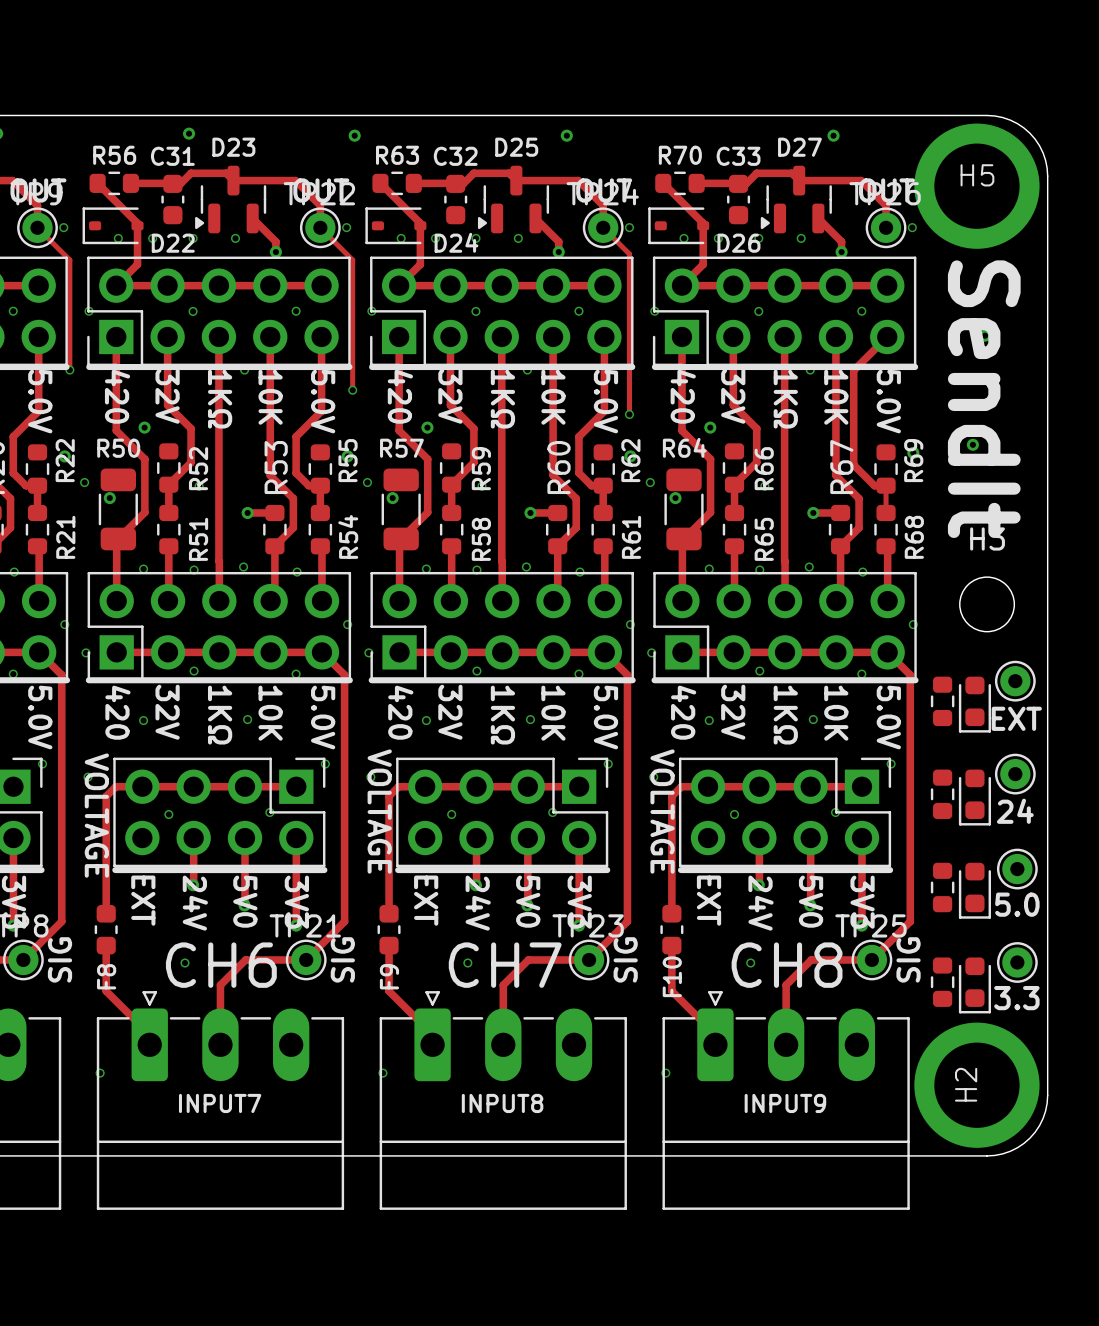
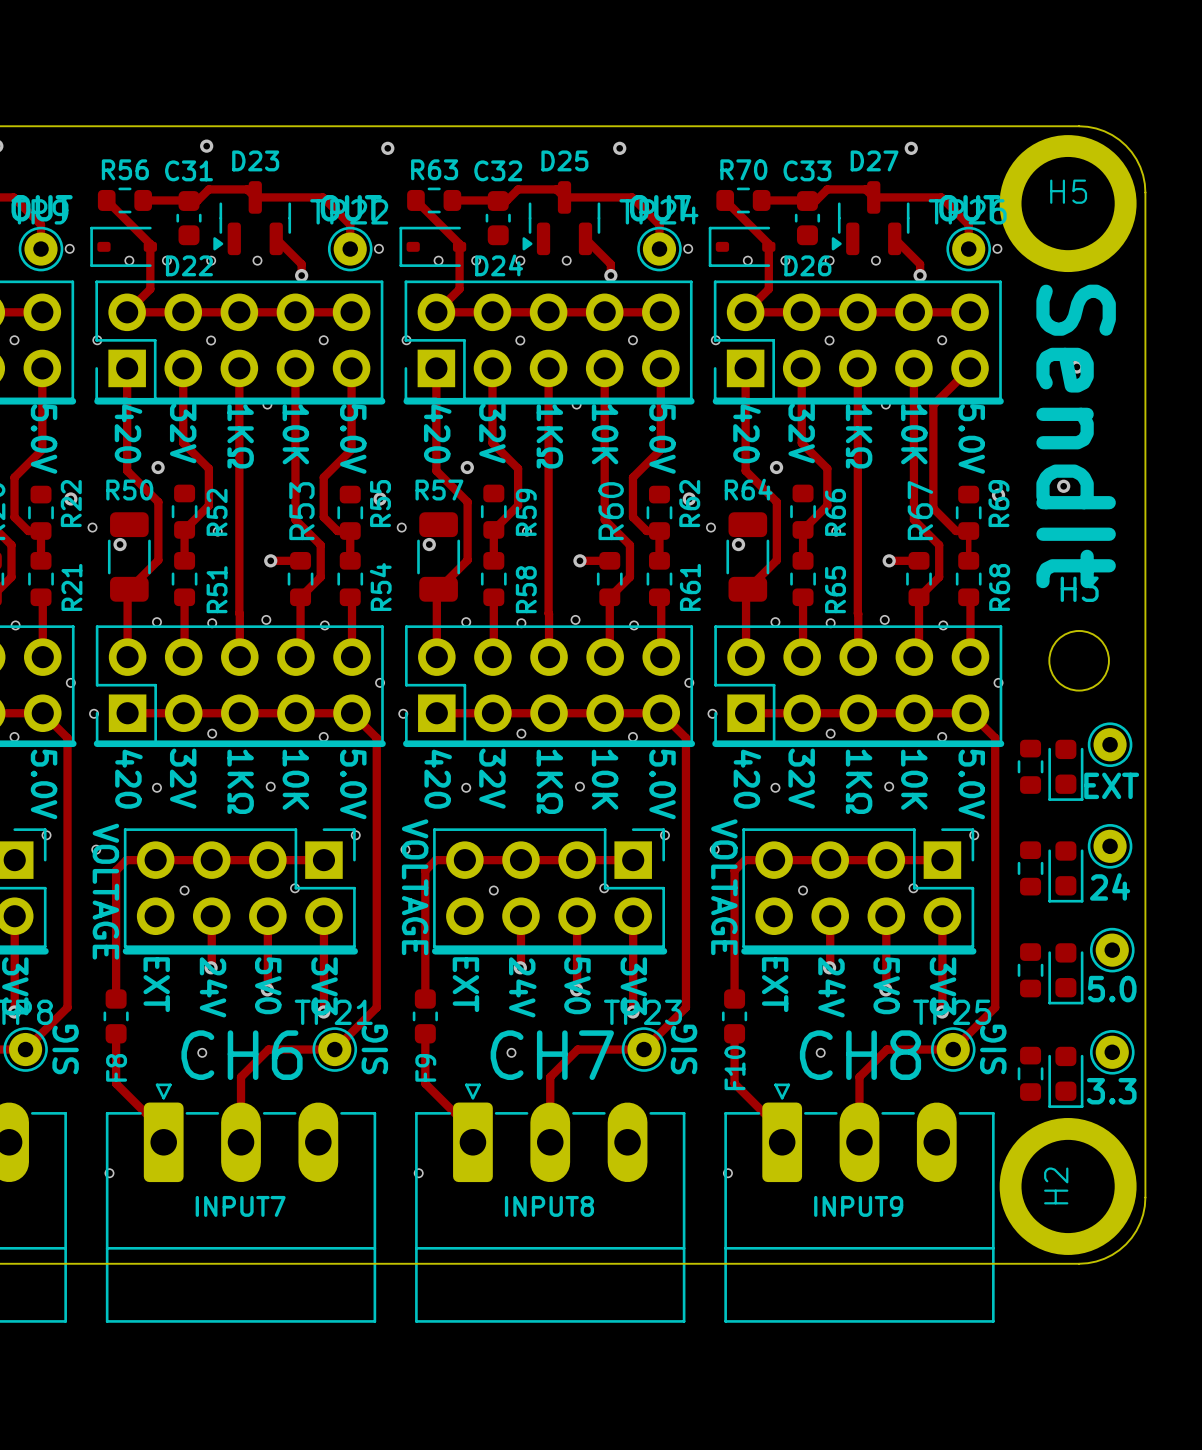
track: (37, 227) (69, 260) (69, 370) -> none
track: (320, 227) (352, 260) (352, 390) -> none
track: (603, 227) (629, 254) (629, 414) -> none
via: (69, 370) -> none
via: (352, 390) -> none
via: (629, 414) -> none

